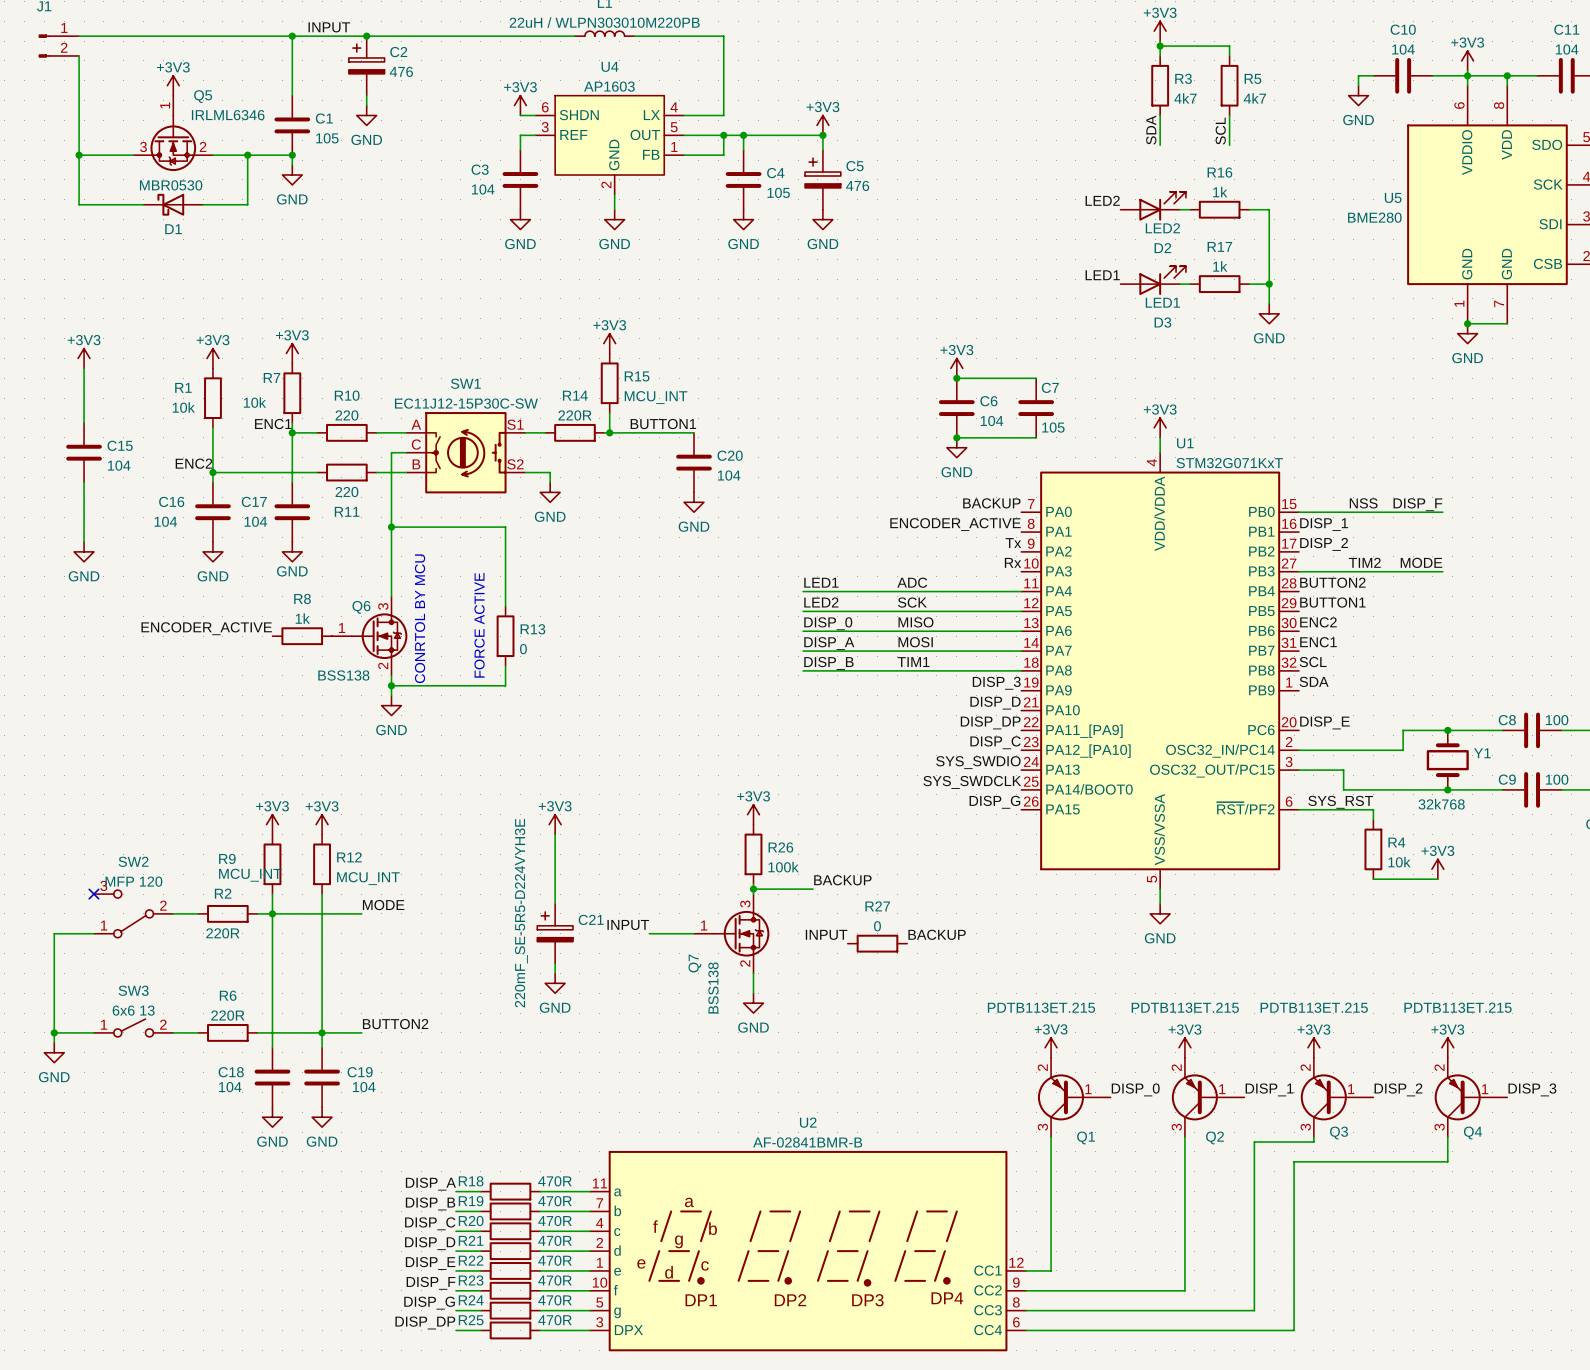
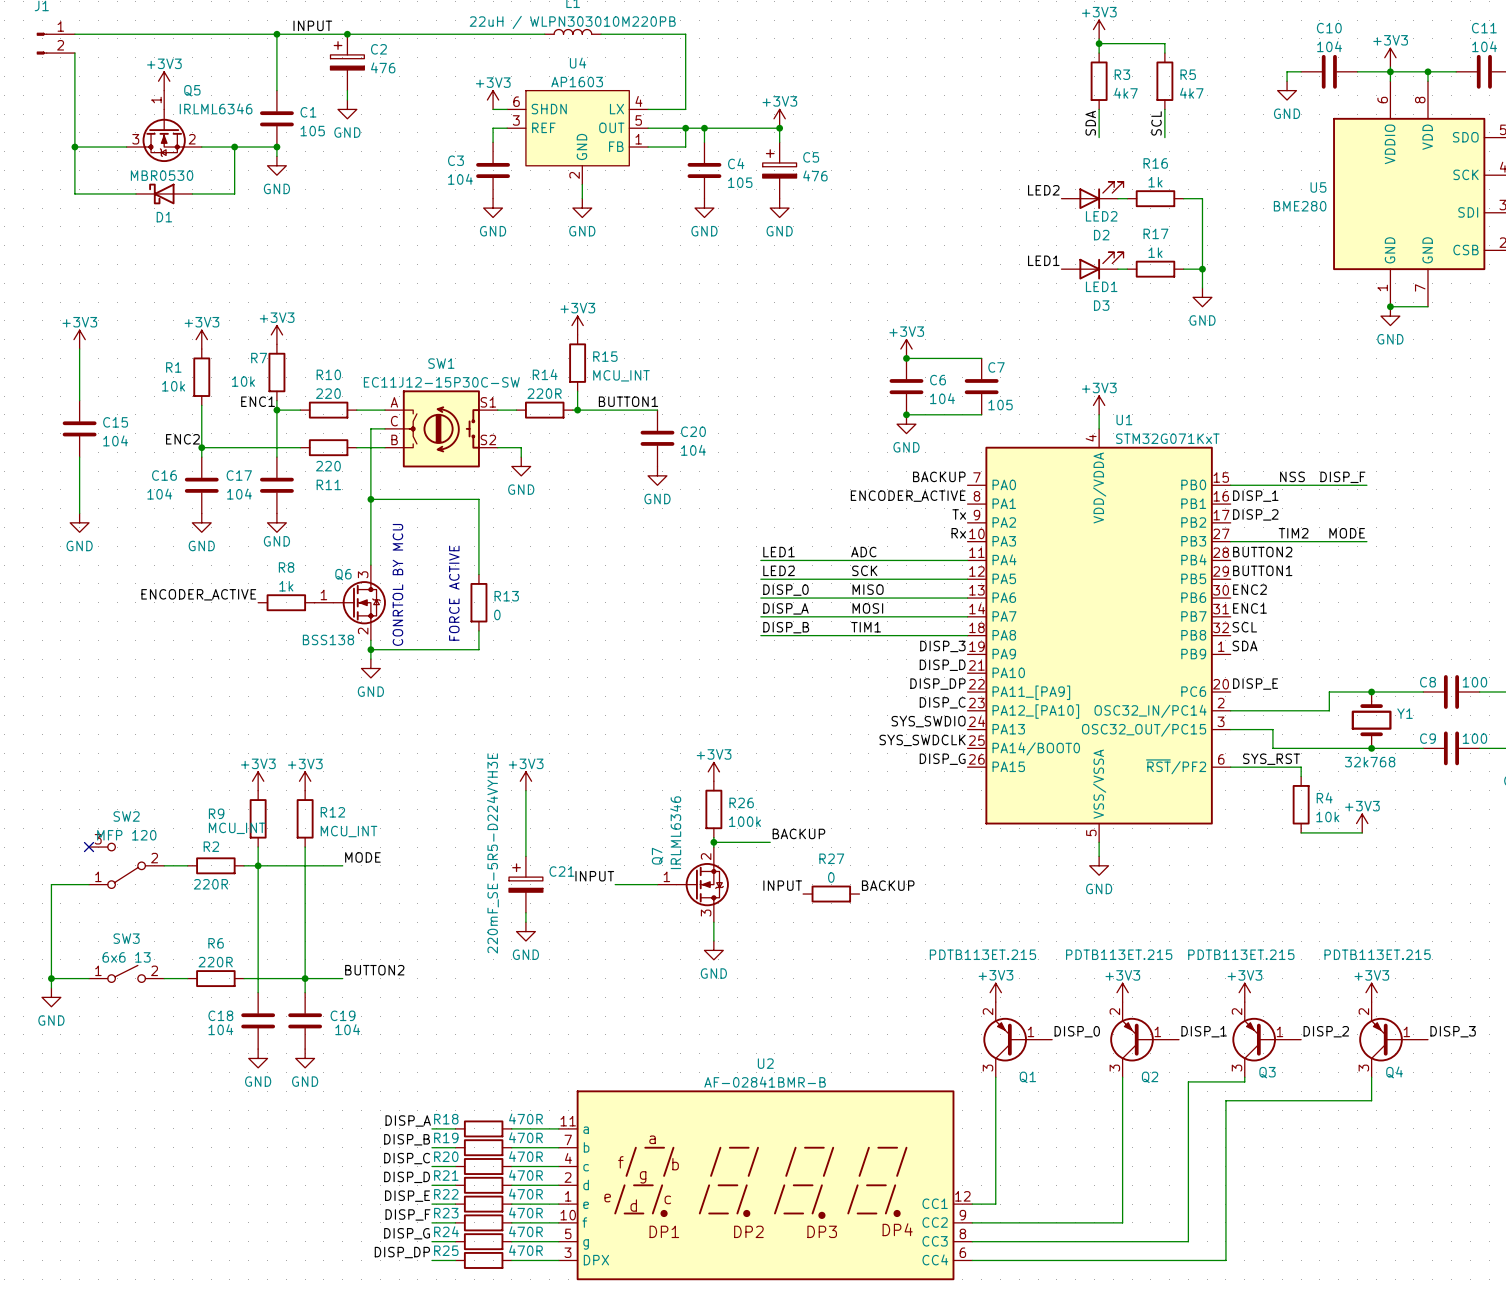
Q7 flip: as is (741, 933) -> up-down (702, 884)
Q7 value: BSS138 (713, 988) -> IRLML6346 (675, 832)

